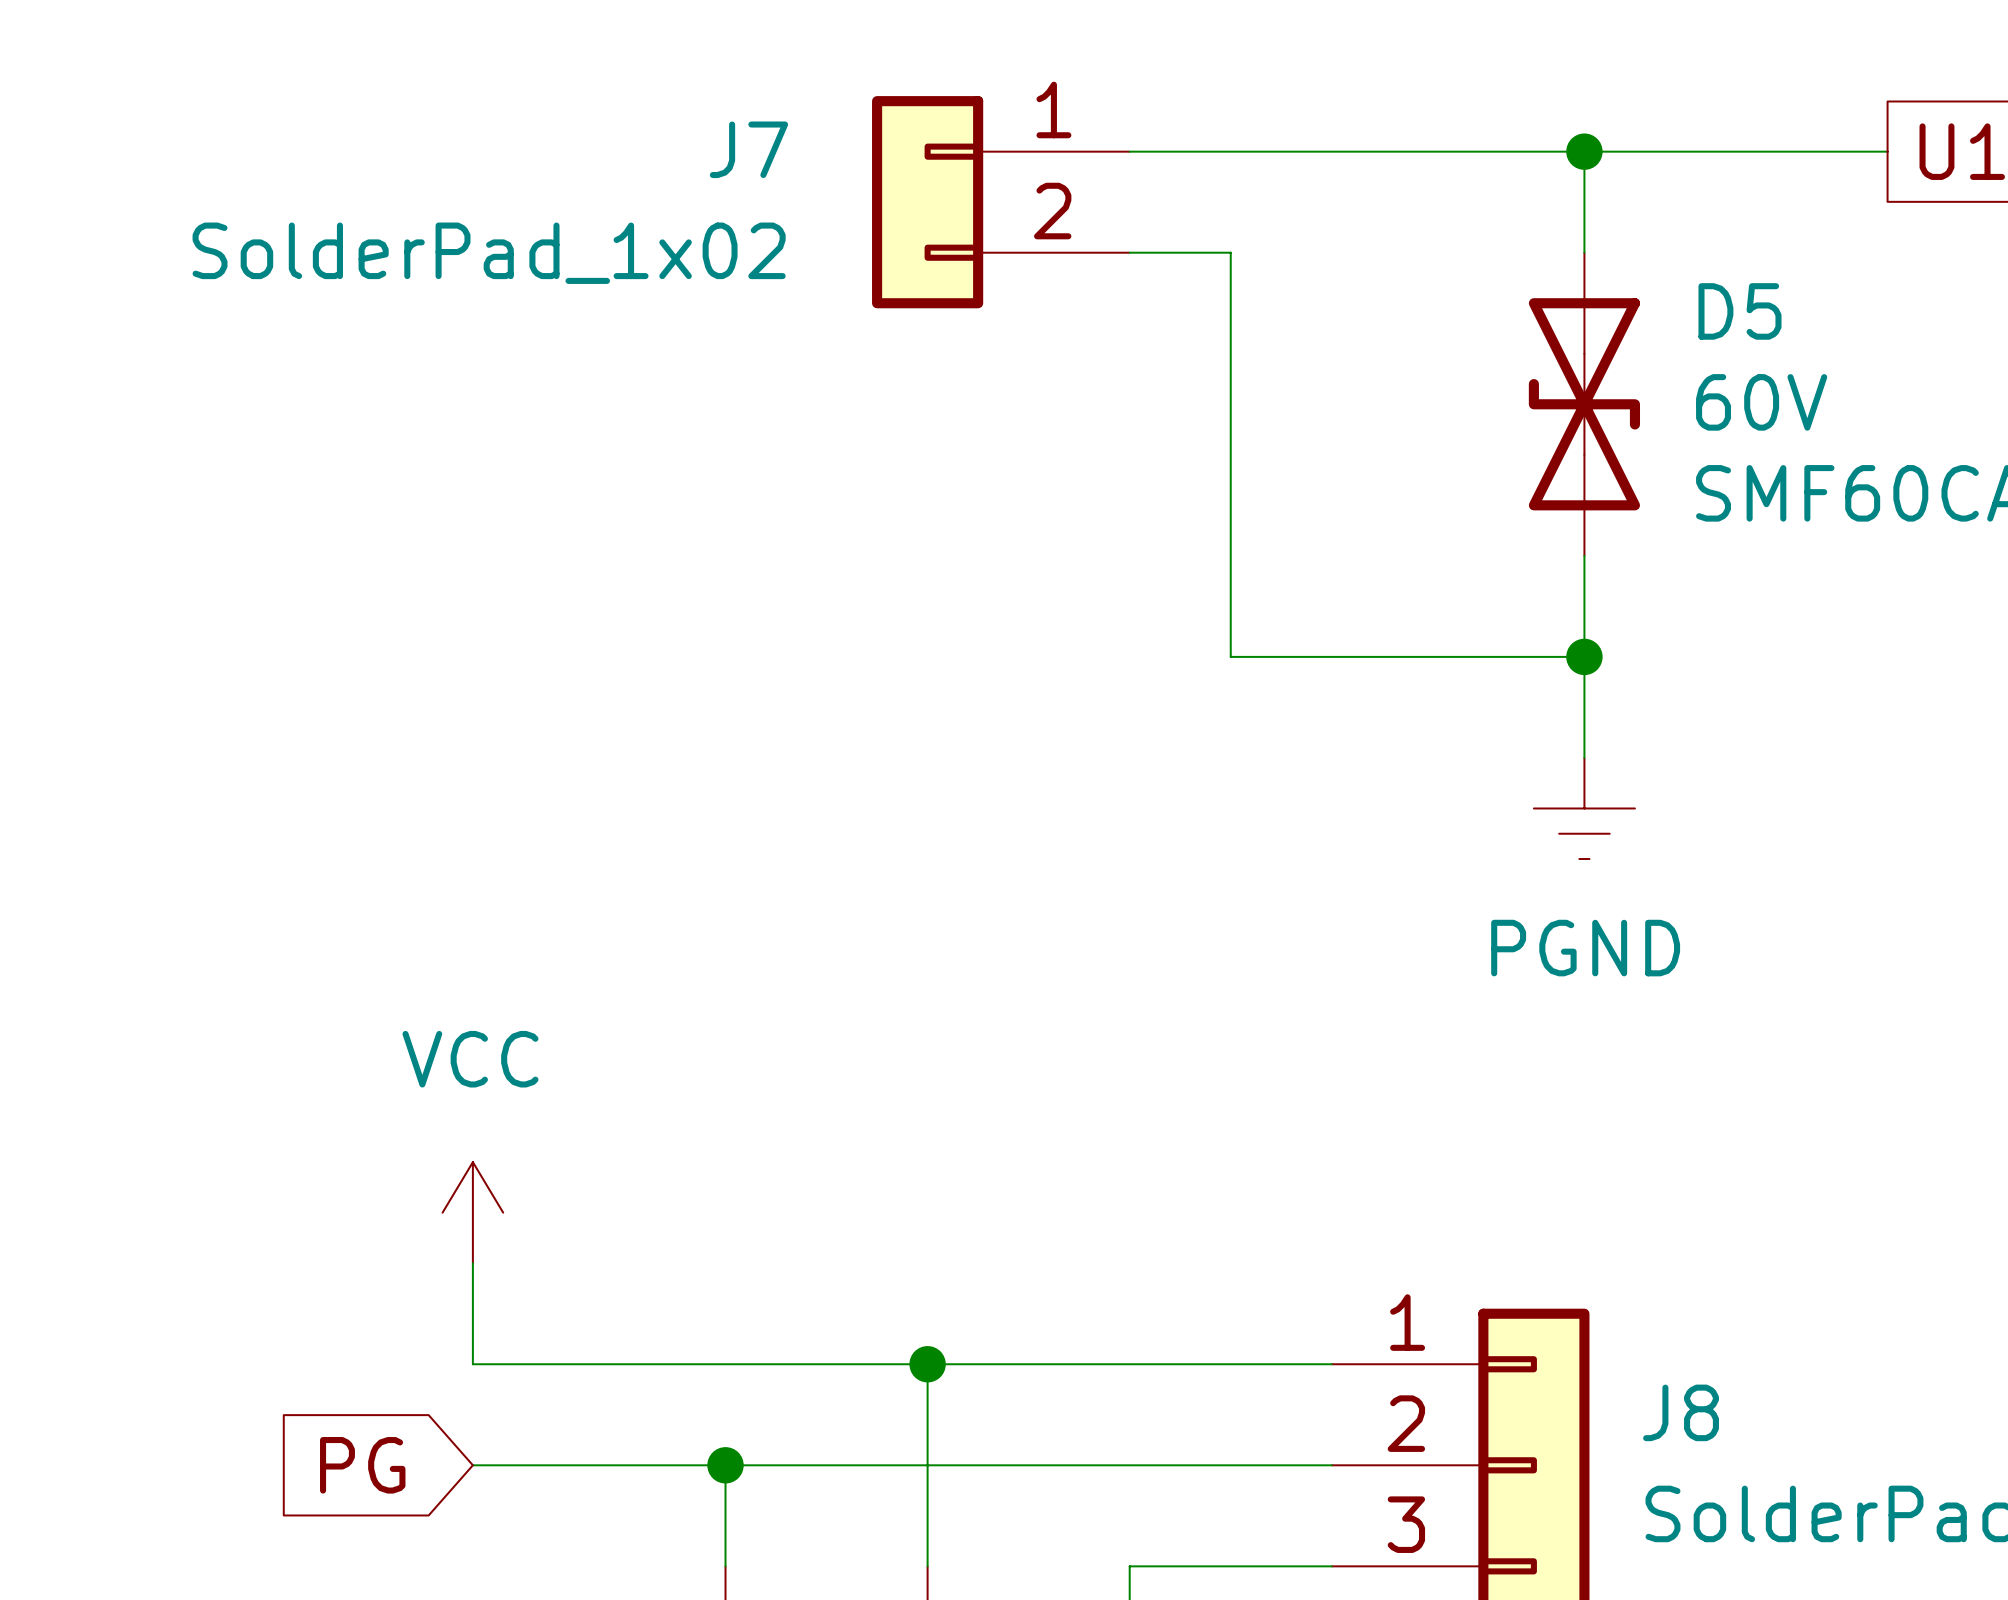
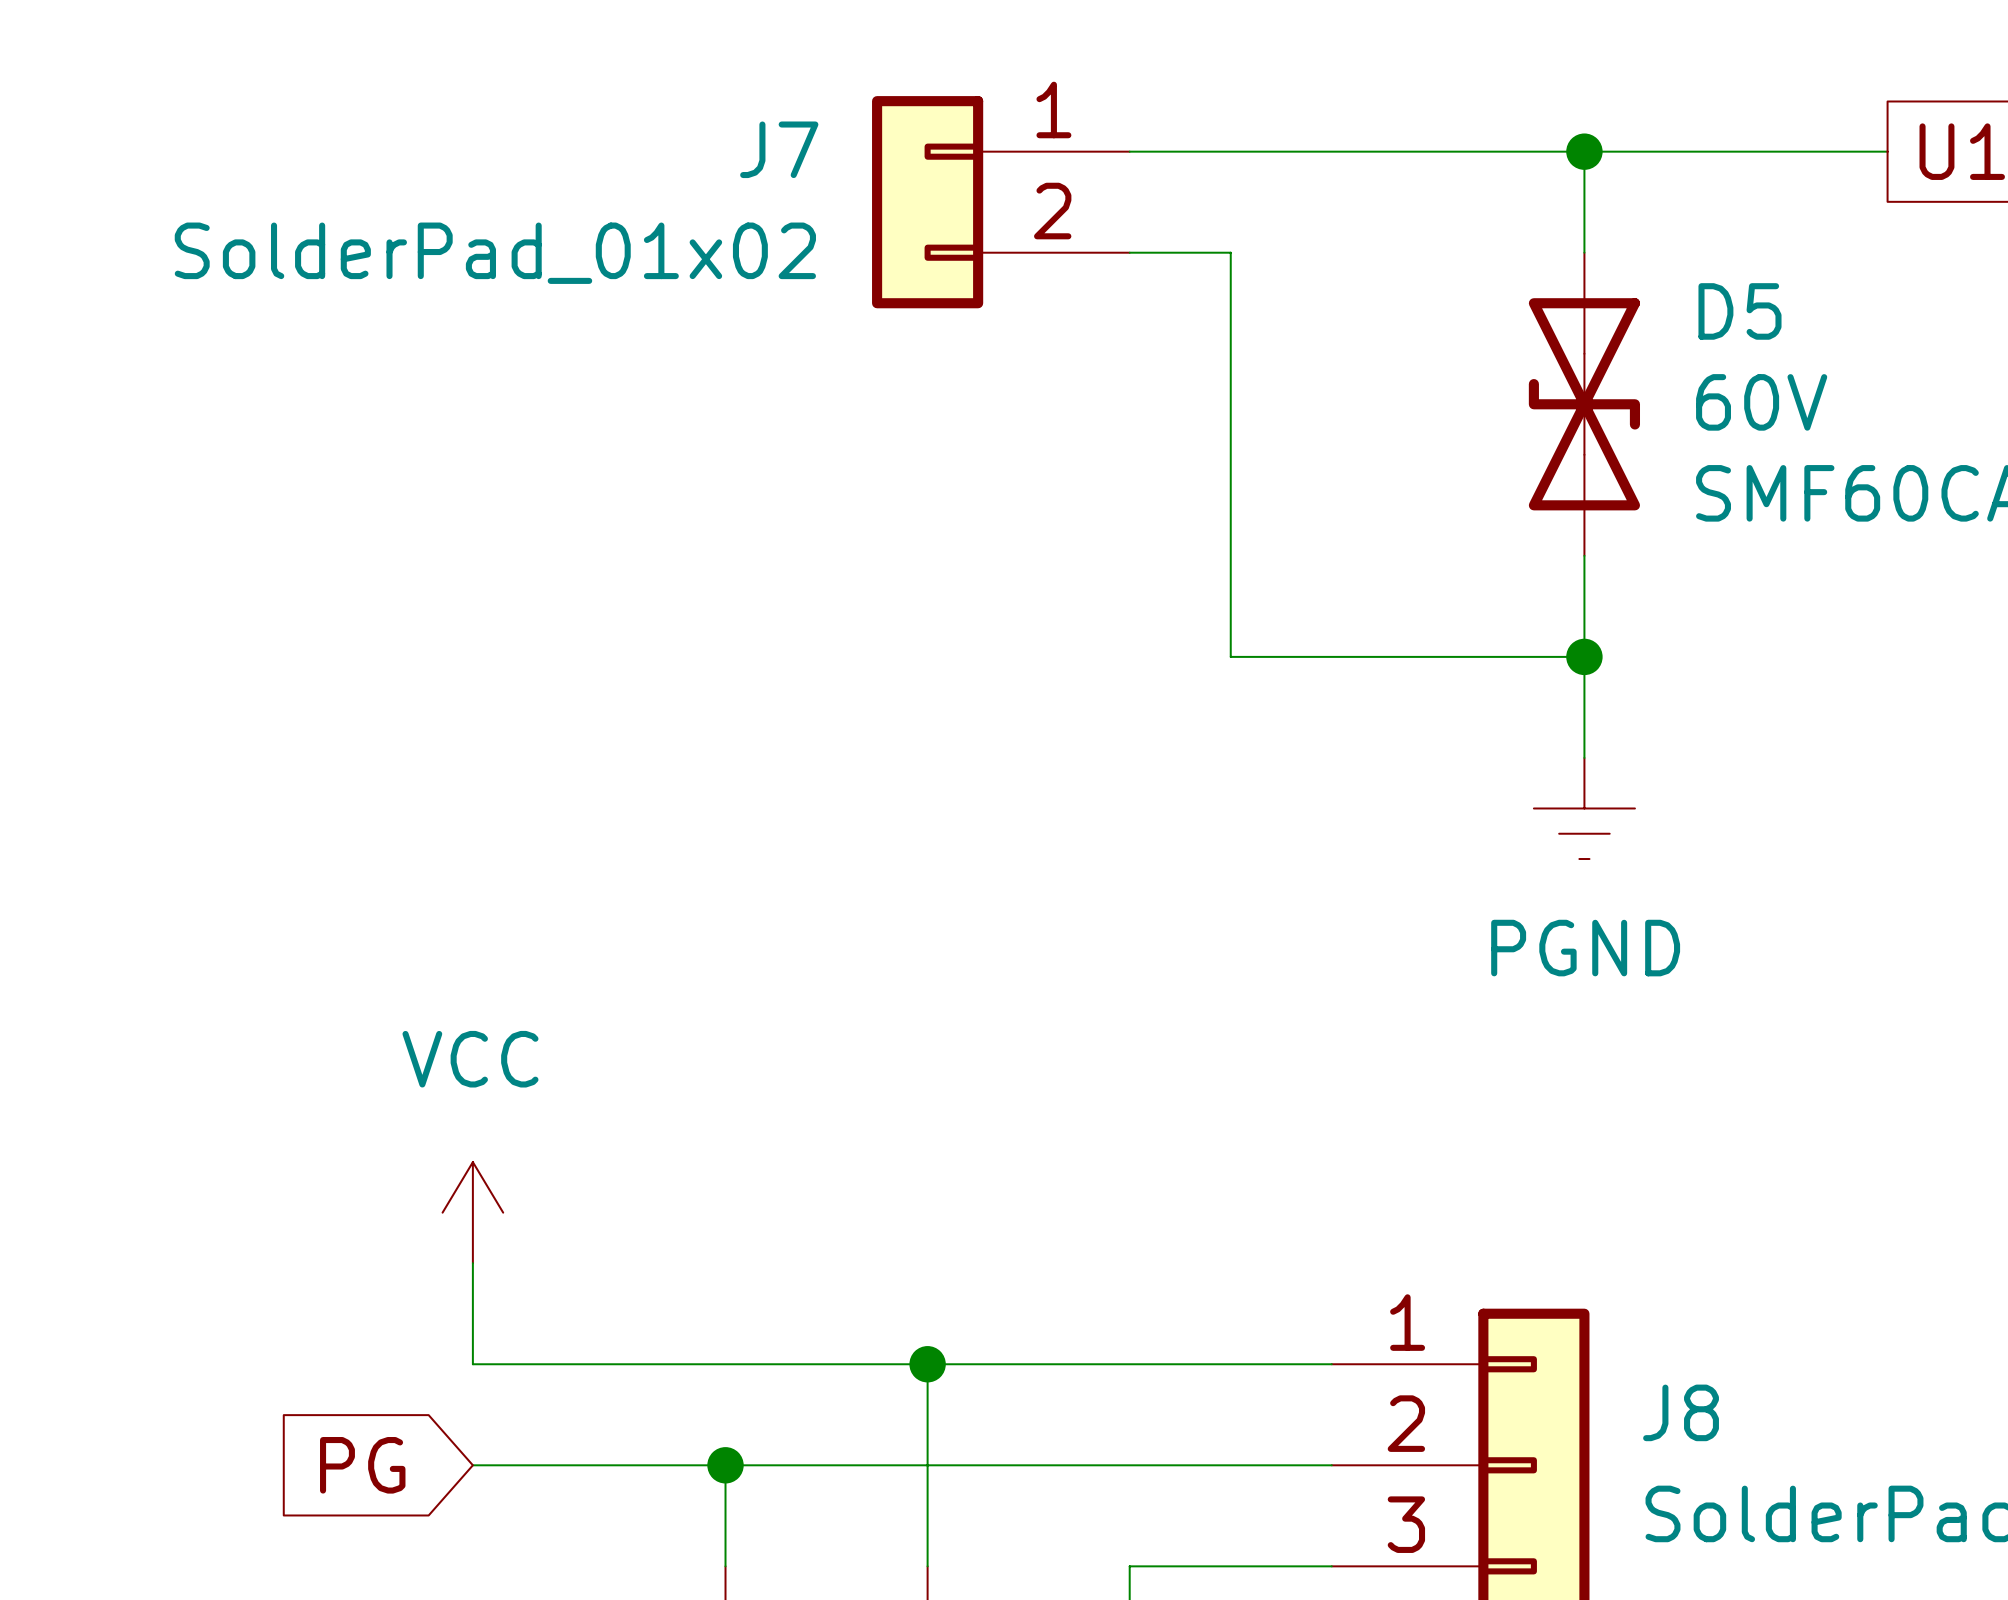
J7 name position: J7 (748, 149) -> J7 (779, 149)
J7 value: SolderPad_1x02 (489, 253) -> SolderPad_01x02 (495, 253)

